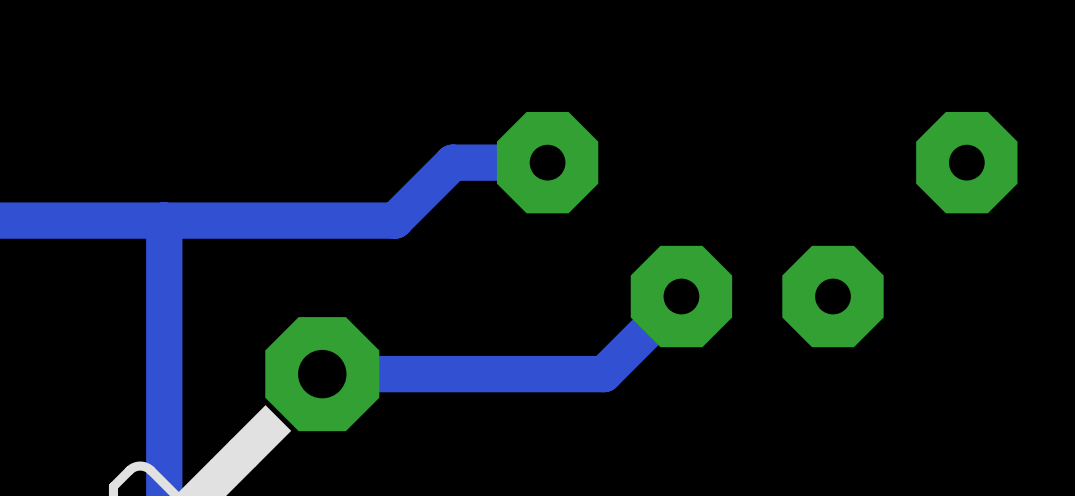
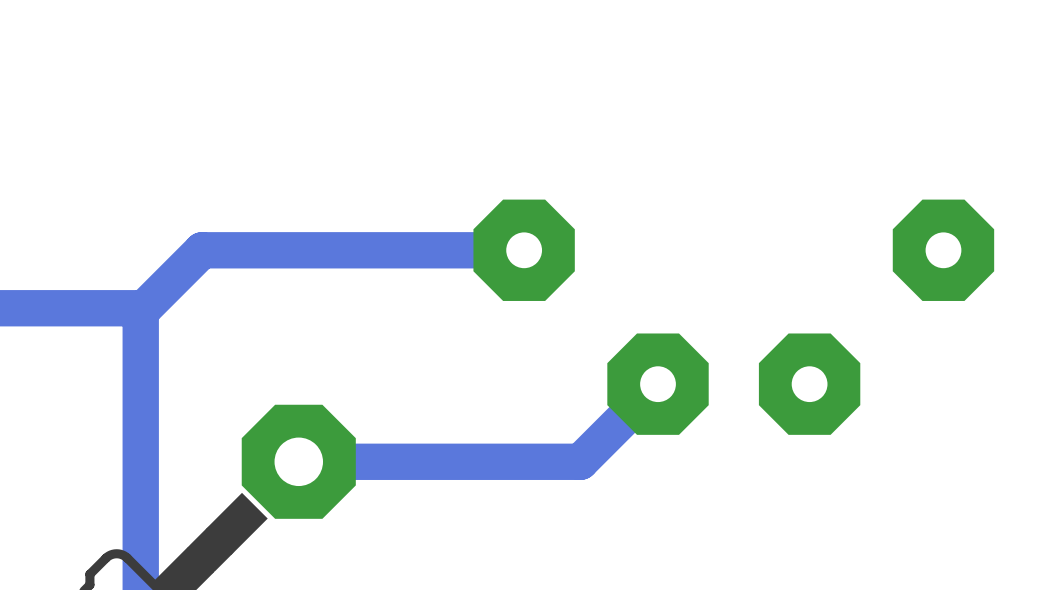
track: (452, 162) (394, 220) (167, 220) -> (429, 250) (202, 250) (144, 308)

